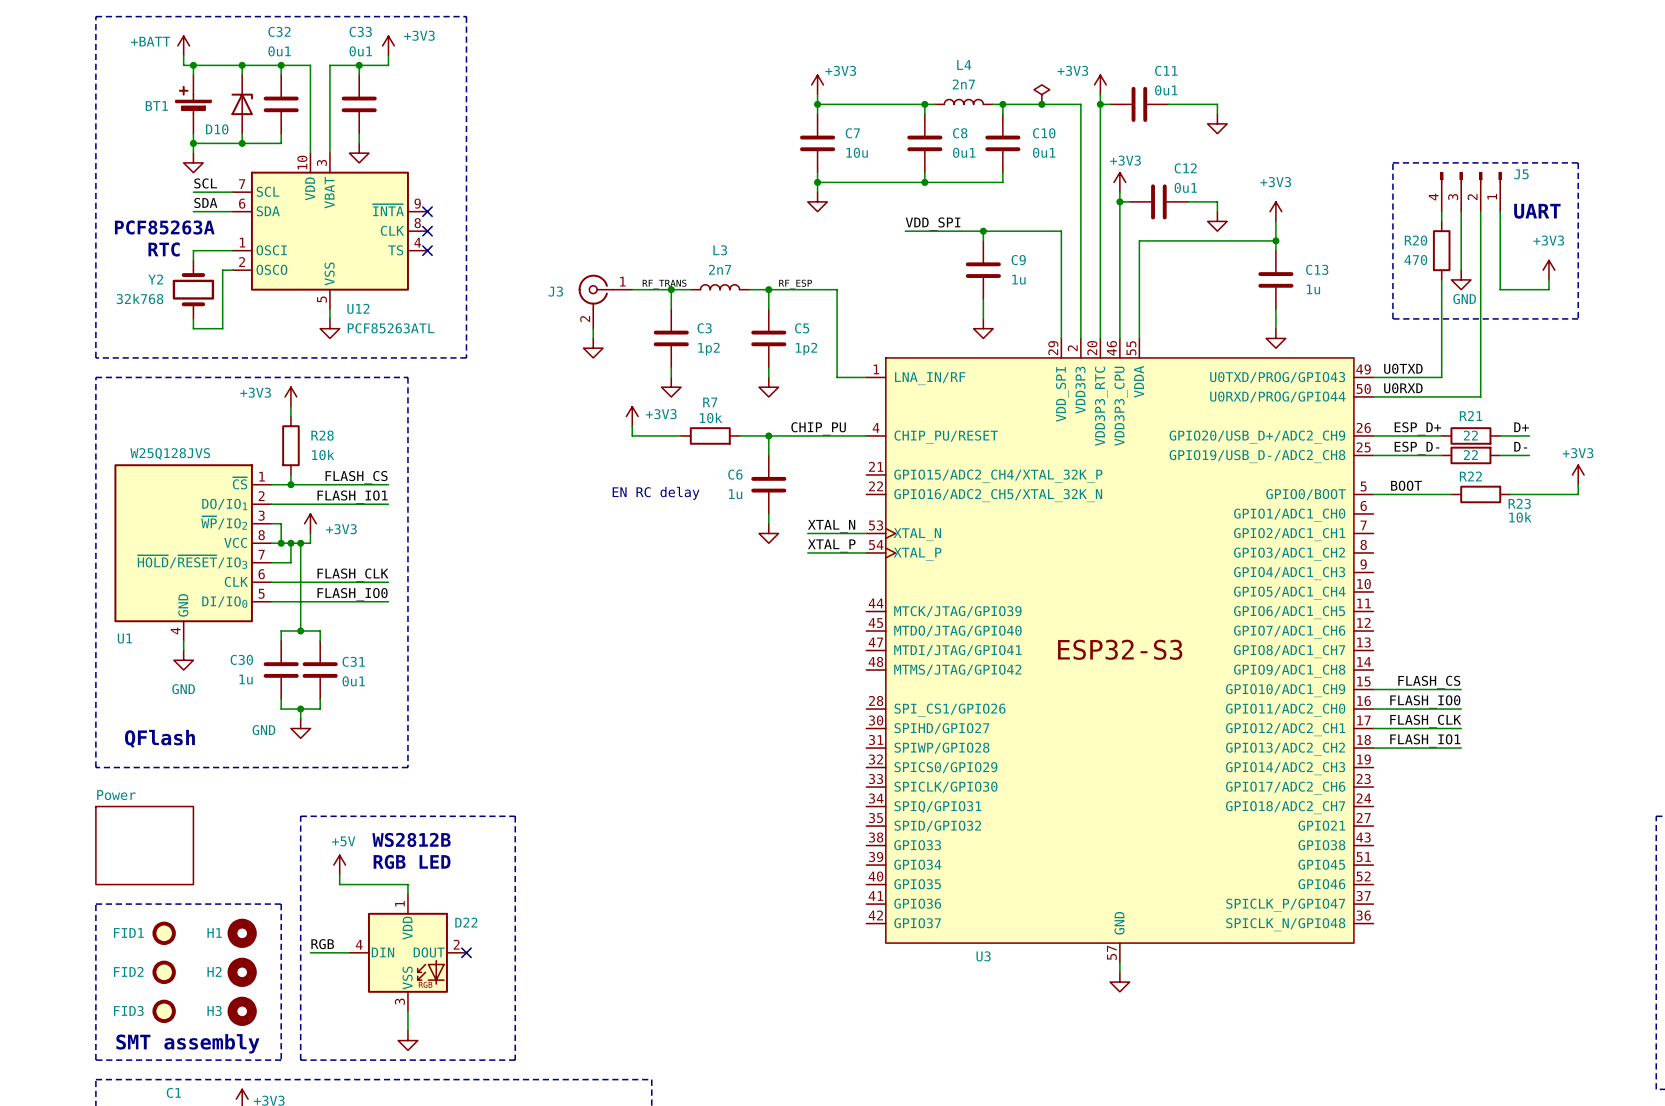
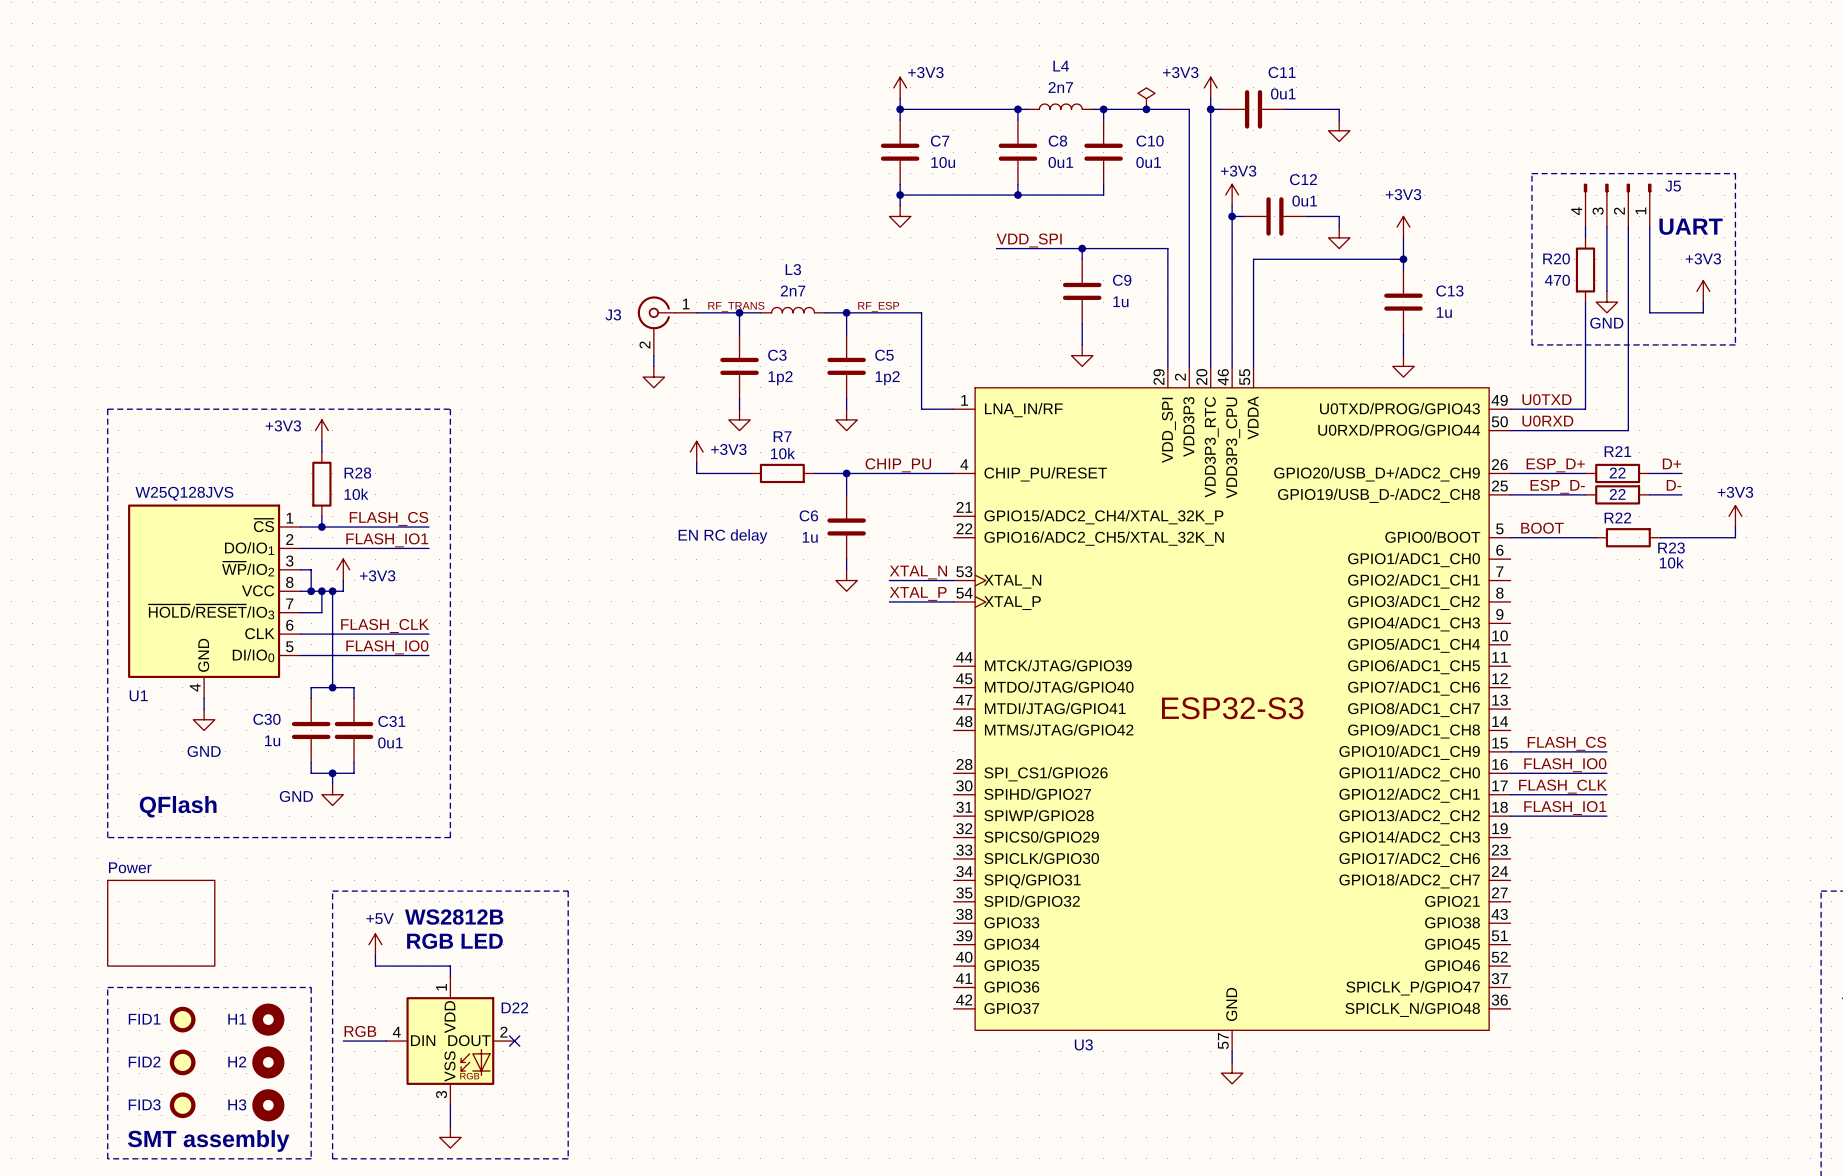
line: (95, 16) (466, 16) (466, 357) (95, 357) (95, 16) -> none
power symbol: +BATT (183, 45) -> none
power symbol: +3V3 (388, 45) -> none
wire: (183, 55) (183, 65) (310, 65) (310, 153) -> none
wire: (388, 55) (388, 65) (329, 65) (329, 153) -> none
wire: (193, 65) (193, 75) -> none
junction: (193, 65) -> none
wire: (242, 65) (242, 75) -> none
junction: (242, 65) -> none
wire: (281, 65) (281, 75) -> none
junction: (281, 65) -> none
wire: (359, 65) (359, 75) -> none
junction: (359, 65) -> none
BT1: (193, 104) -> none
D10: (242, 104) -> none
C32: 0u1 (281, 104) -> none
C33: 0u1 (359, 104) -> none
wire: (193, 133) (193, 153) -> none
wire: (242, 133) (242, 143) -> none
wire: (281, 133) (281, 143) (193, 143) -> none
wire: (359, 133) (359, 143) -> none
junction: (193, 143) -> none
junction: (242, 143) -> none
power symbol: (359, 153) -> none
power symbol: (193, 162) -> none
label: SCL (205, 183) -> none
wire: (193, 192) (232, 192) -> none
label: SDA (205, 202) -> none
wire: (193, 211) (232, 211) -> none
no-connect mark: (427, 211) -> none
text: PCF85263A (164, 227) -> none
U12: PCF85263ATL (329, 231) -> none
no-connect mark: (427, 231) -> none
text: RTC (164, 249) -> none
wire: (232, 250) (193, 250) (193, 260) -> none
no-connect mark: (427, 250) -> none
wire: (232, 270) (222, 270) (222, 328) (193, 328) (193, 318) -> none
Y2: 32k768 (193, 289) -> none
wire: (329, 309) (329, 318) -> none
power symbol: (329, 328) -> none

